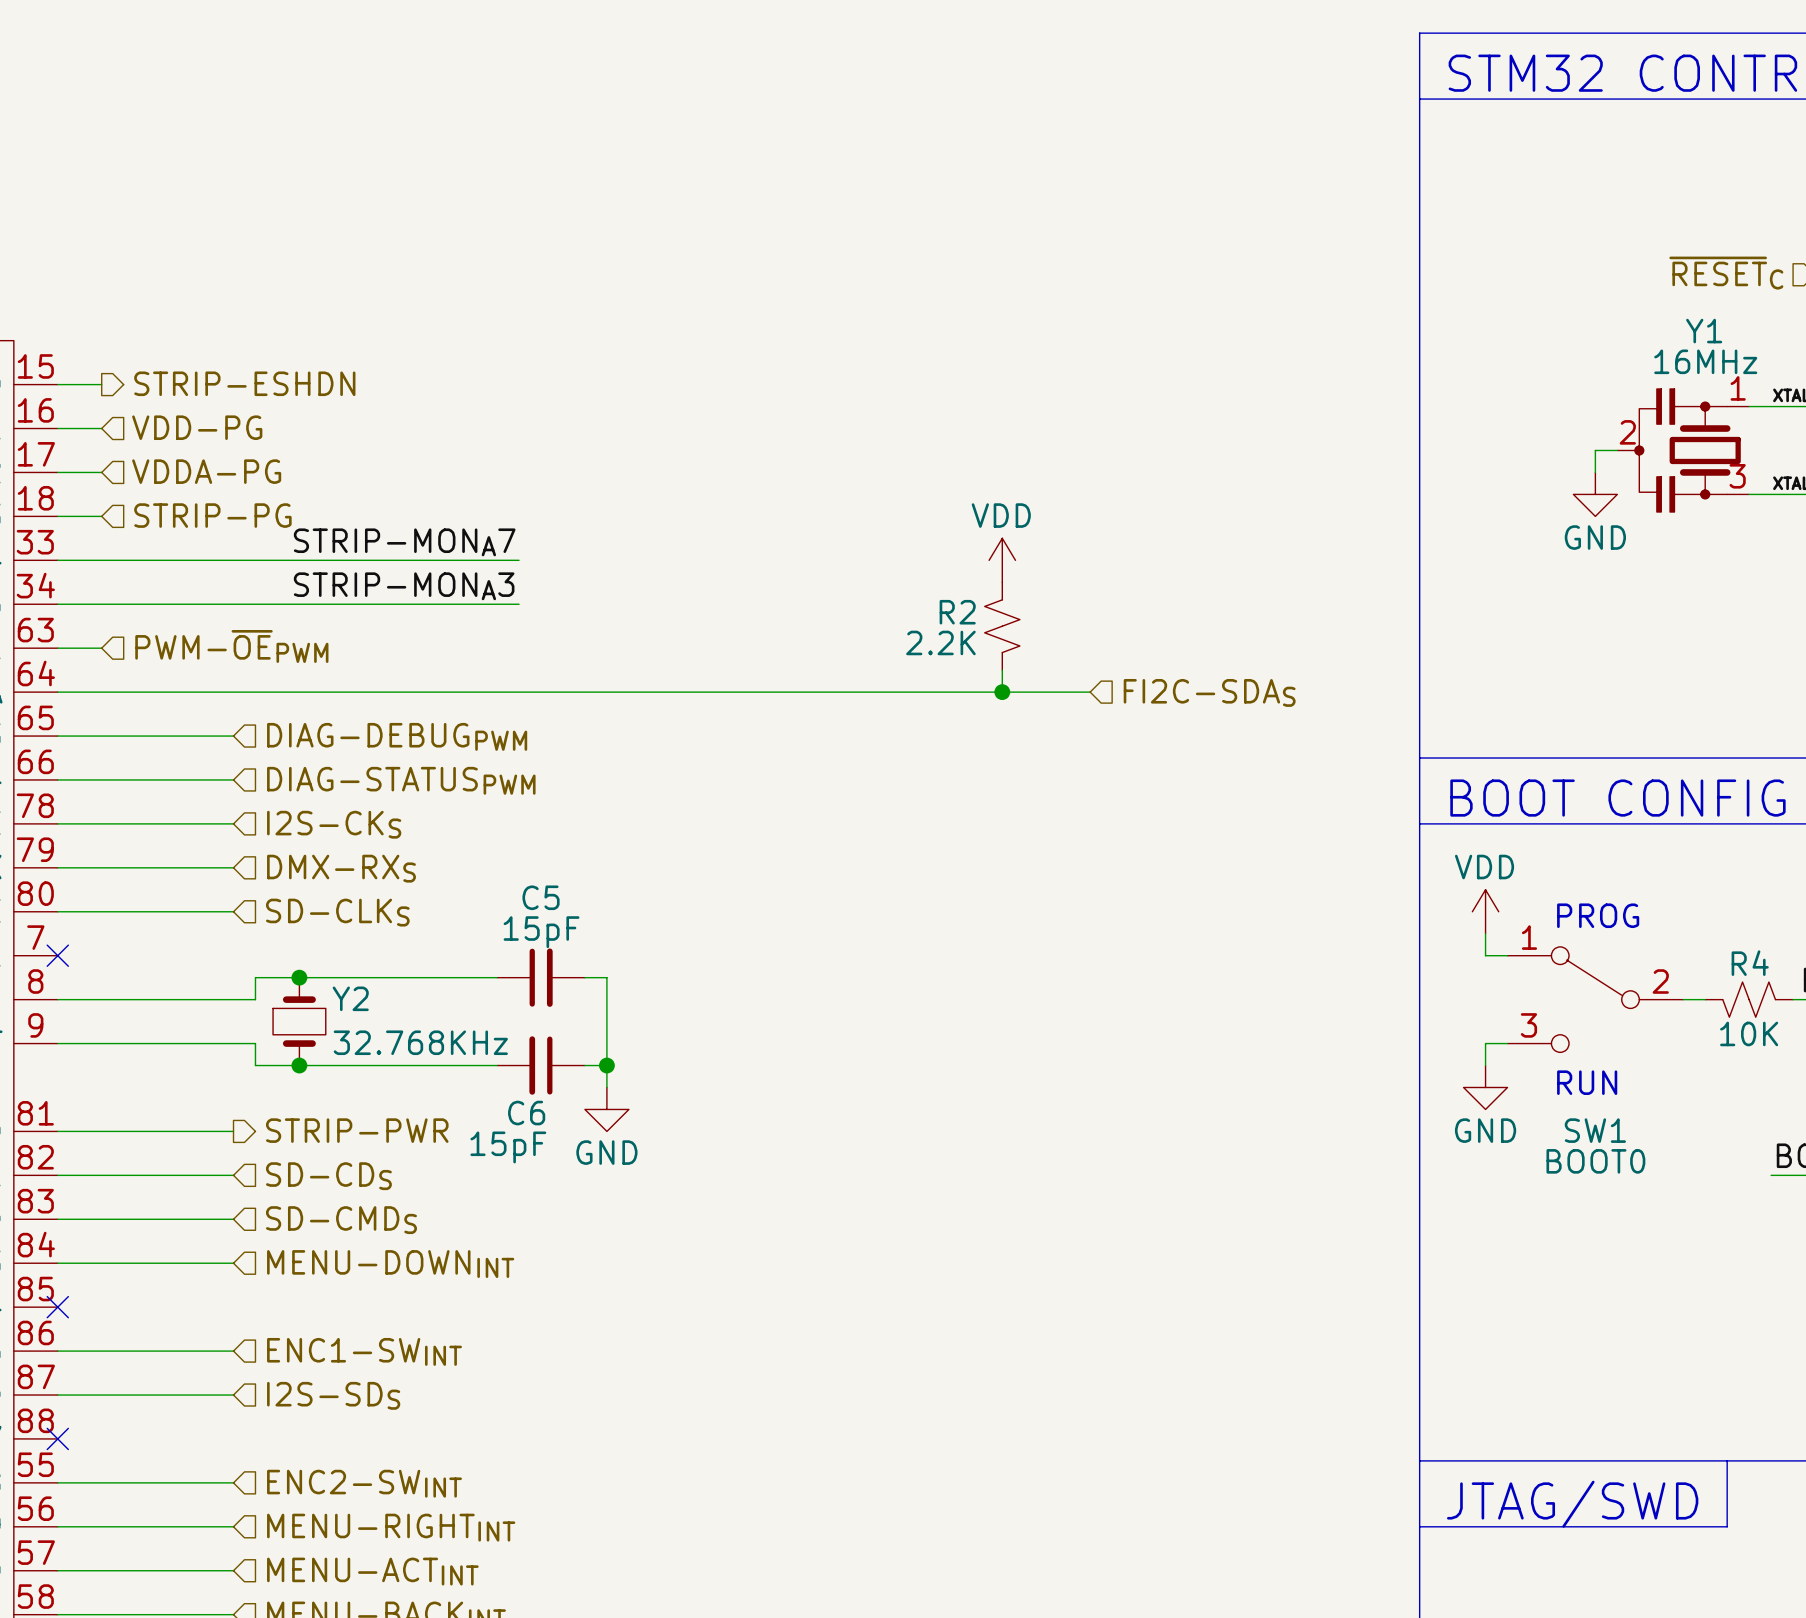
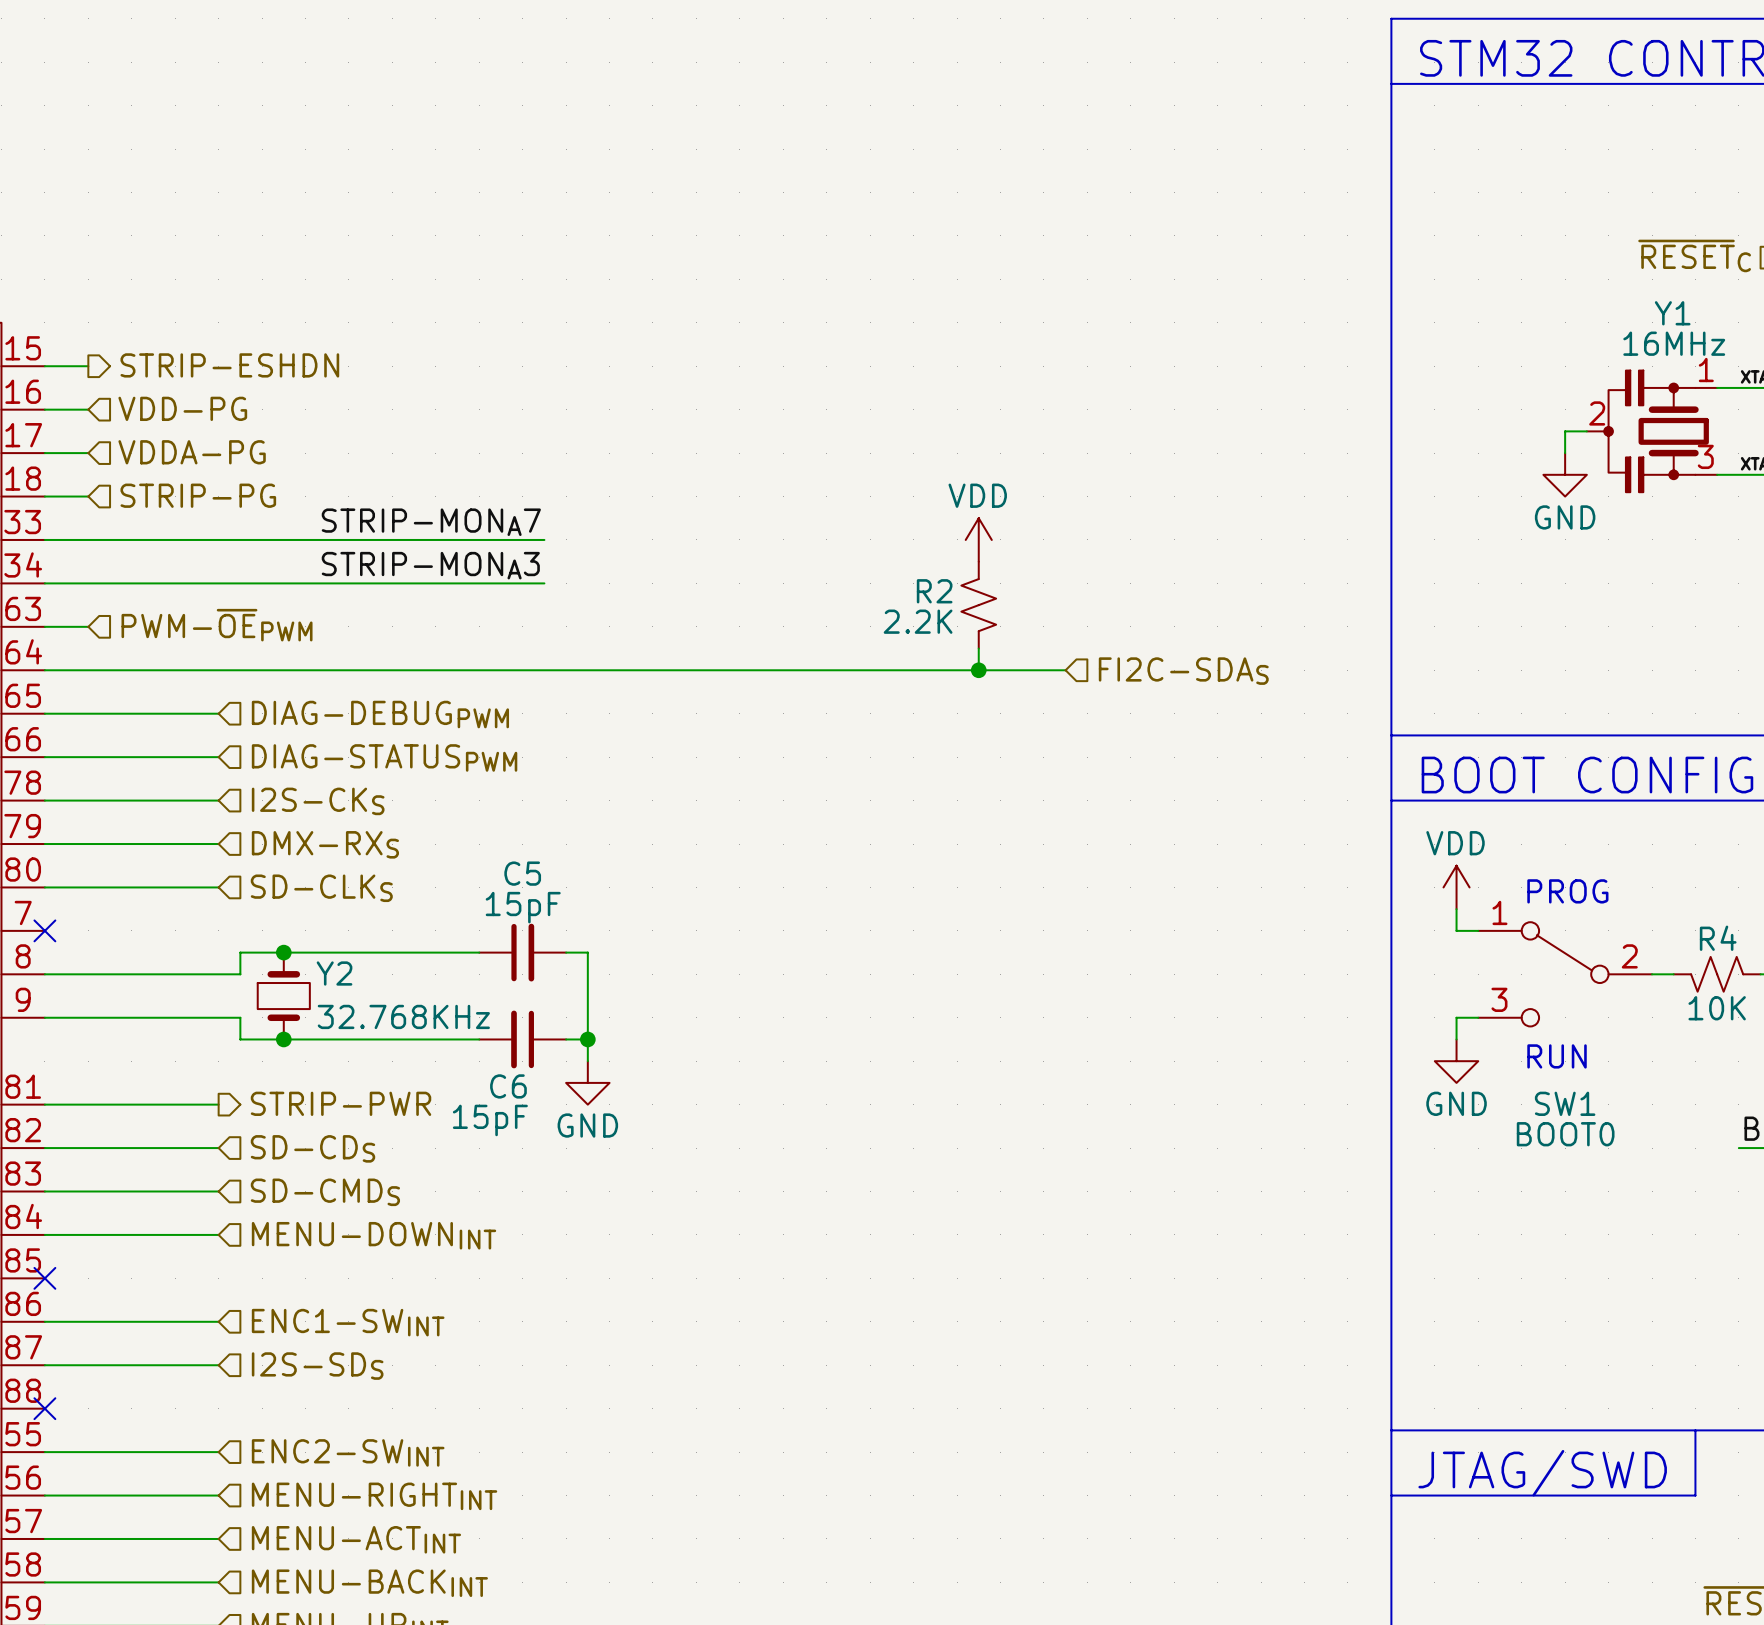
label position: STRIP-MONA7 (404, 542) -> STRIP-MONA7 (431, 522)
wire: none -> (500, 539) (544, 539)
label position: STRIP-MONA3 (404, 586) -> STRIP-MONA3 (430, 565)
wire: none -> (500, 583) (544, 583)

